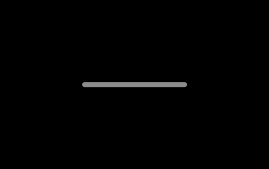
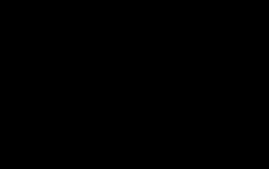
line: (84, 84) (184, 84) -> none

